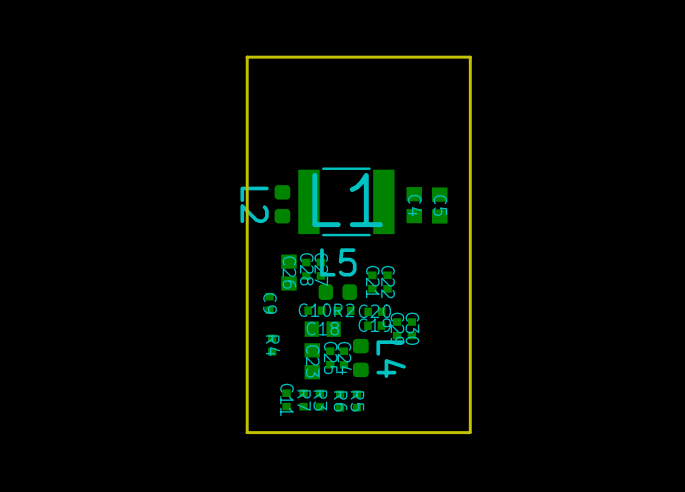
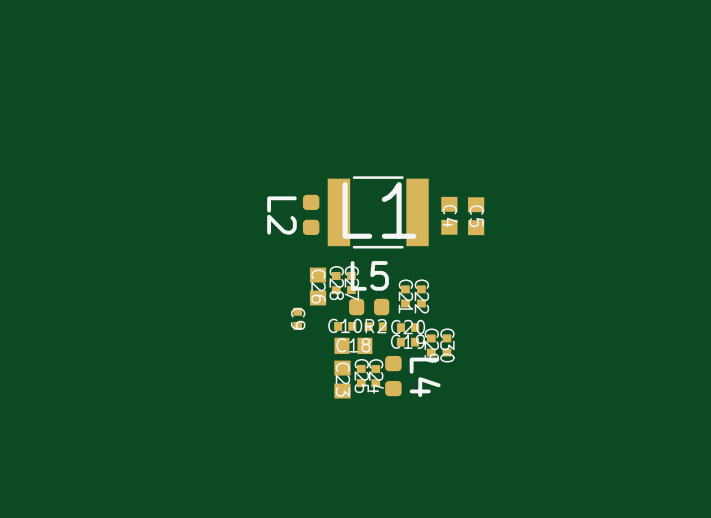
board edge: (247, 57) (247, 431) -> none
board edge: (470, 57) (470, 432) -> none
board edge: (470, 57) (246, 57) -> none
R4: (272, 345) -> none
C11: (286, 399) -> none
R7: (303, 399) -> none
R3: (319, 400) -> none
R5: (356, 400) -> none
R6: (340, 401) -> none
board edge: (469, 432) (246, 432) -> none

